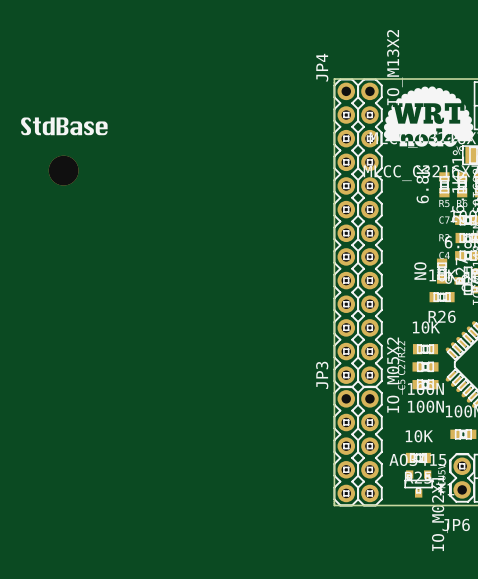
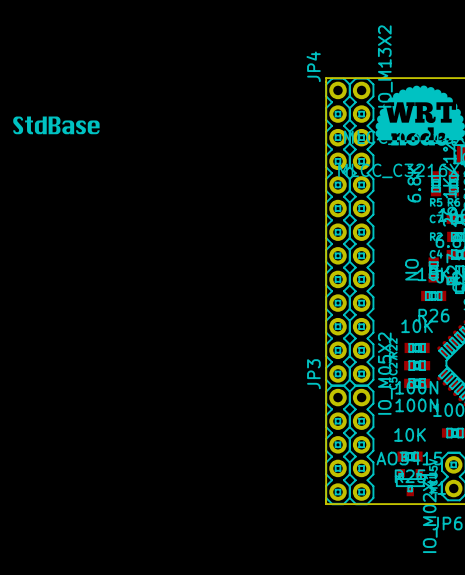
part: (63, 170) -> none

